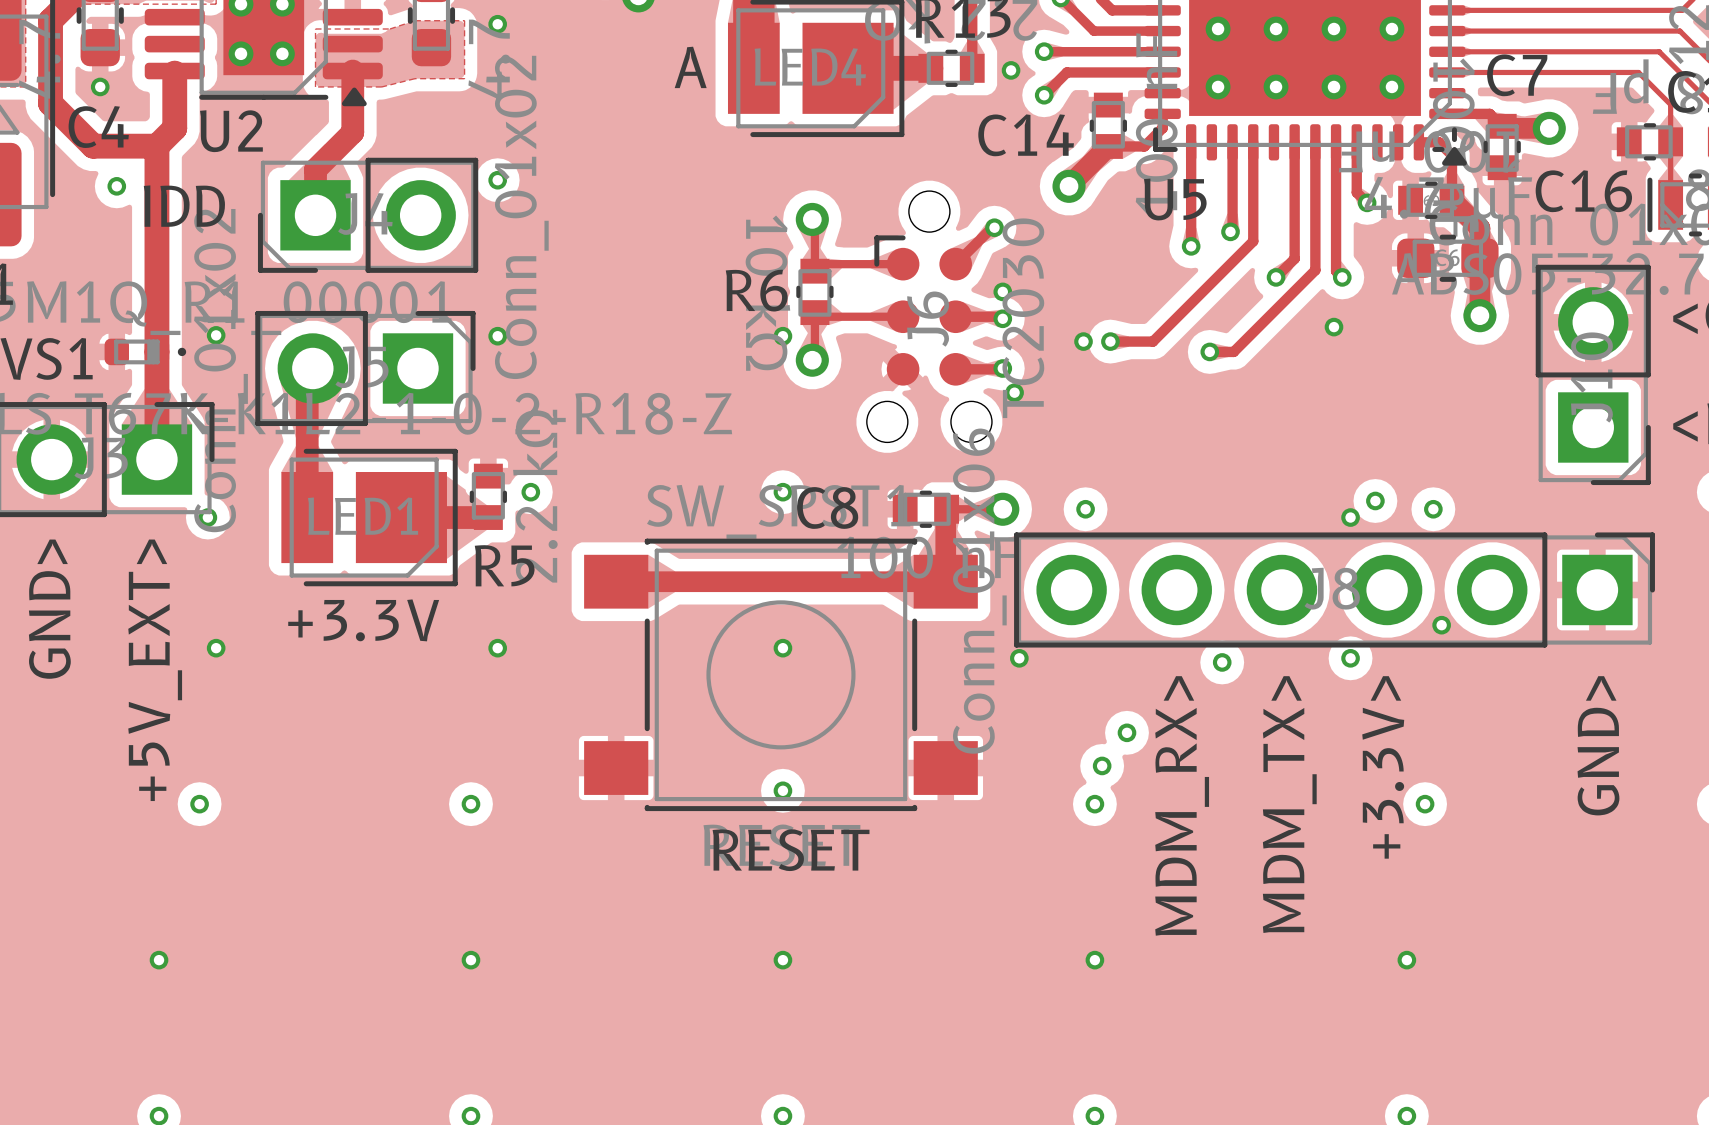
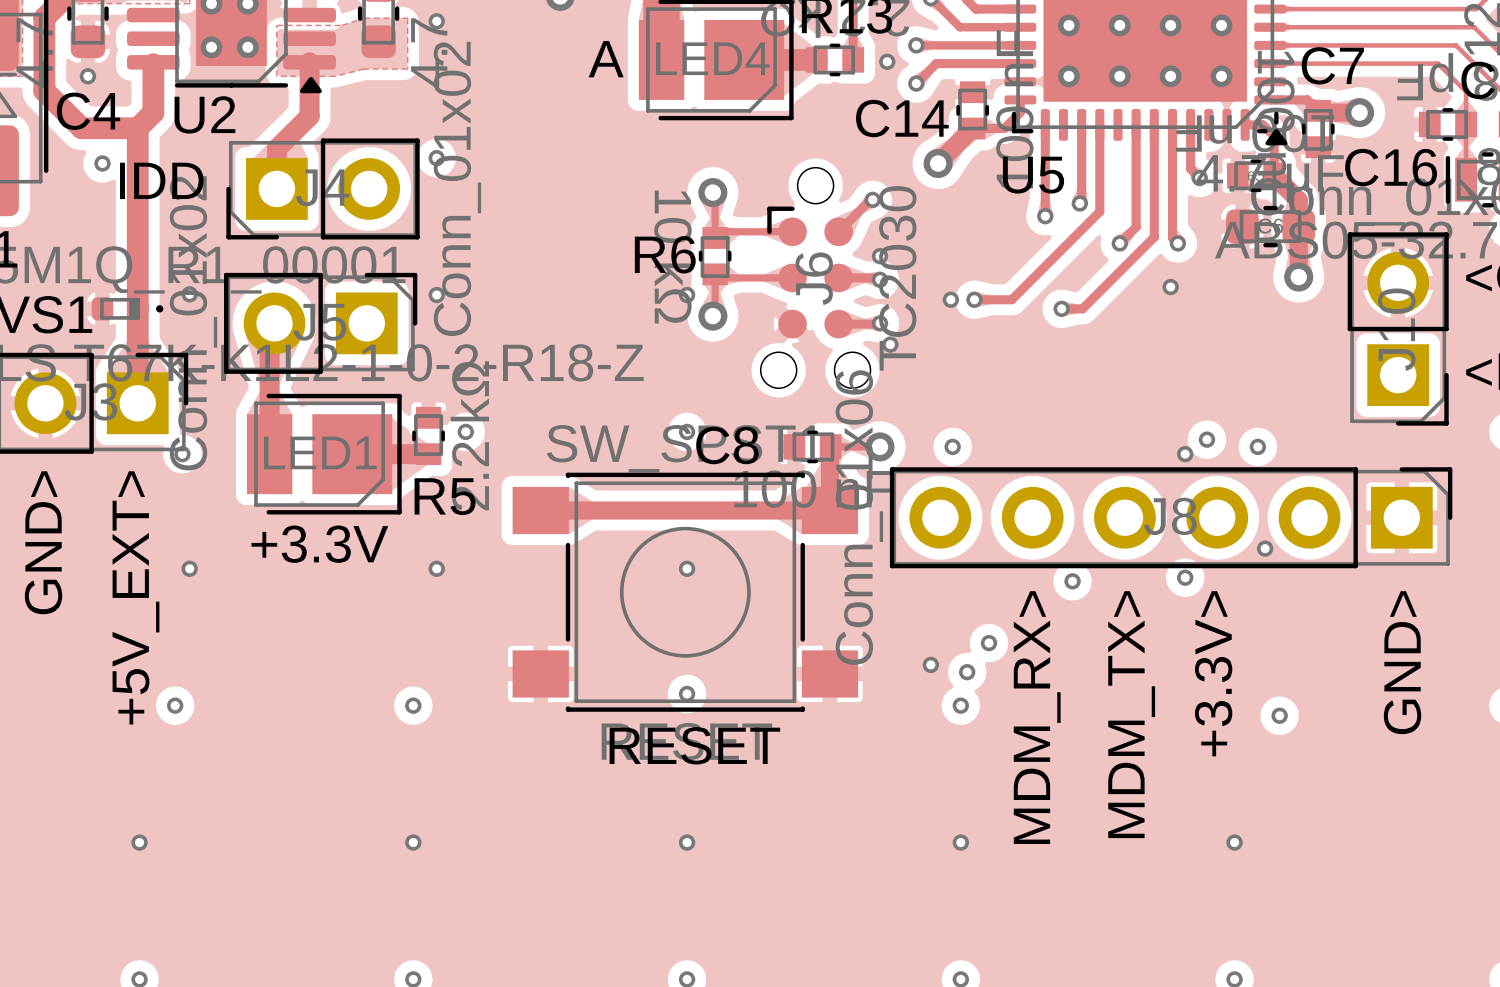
via position: (1019, 658) -> (930, 664)
via position: (1425, 804) -> (1279, 715)

